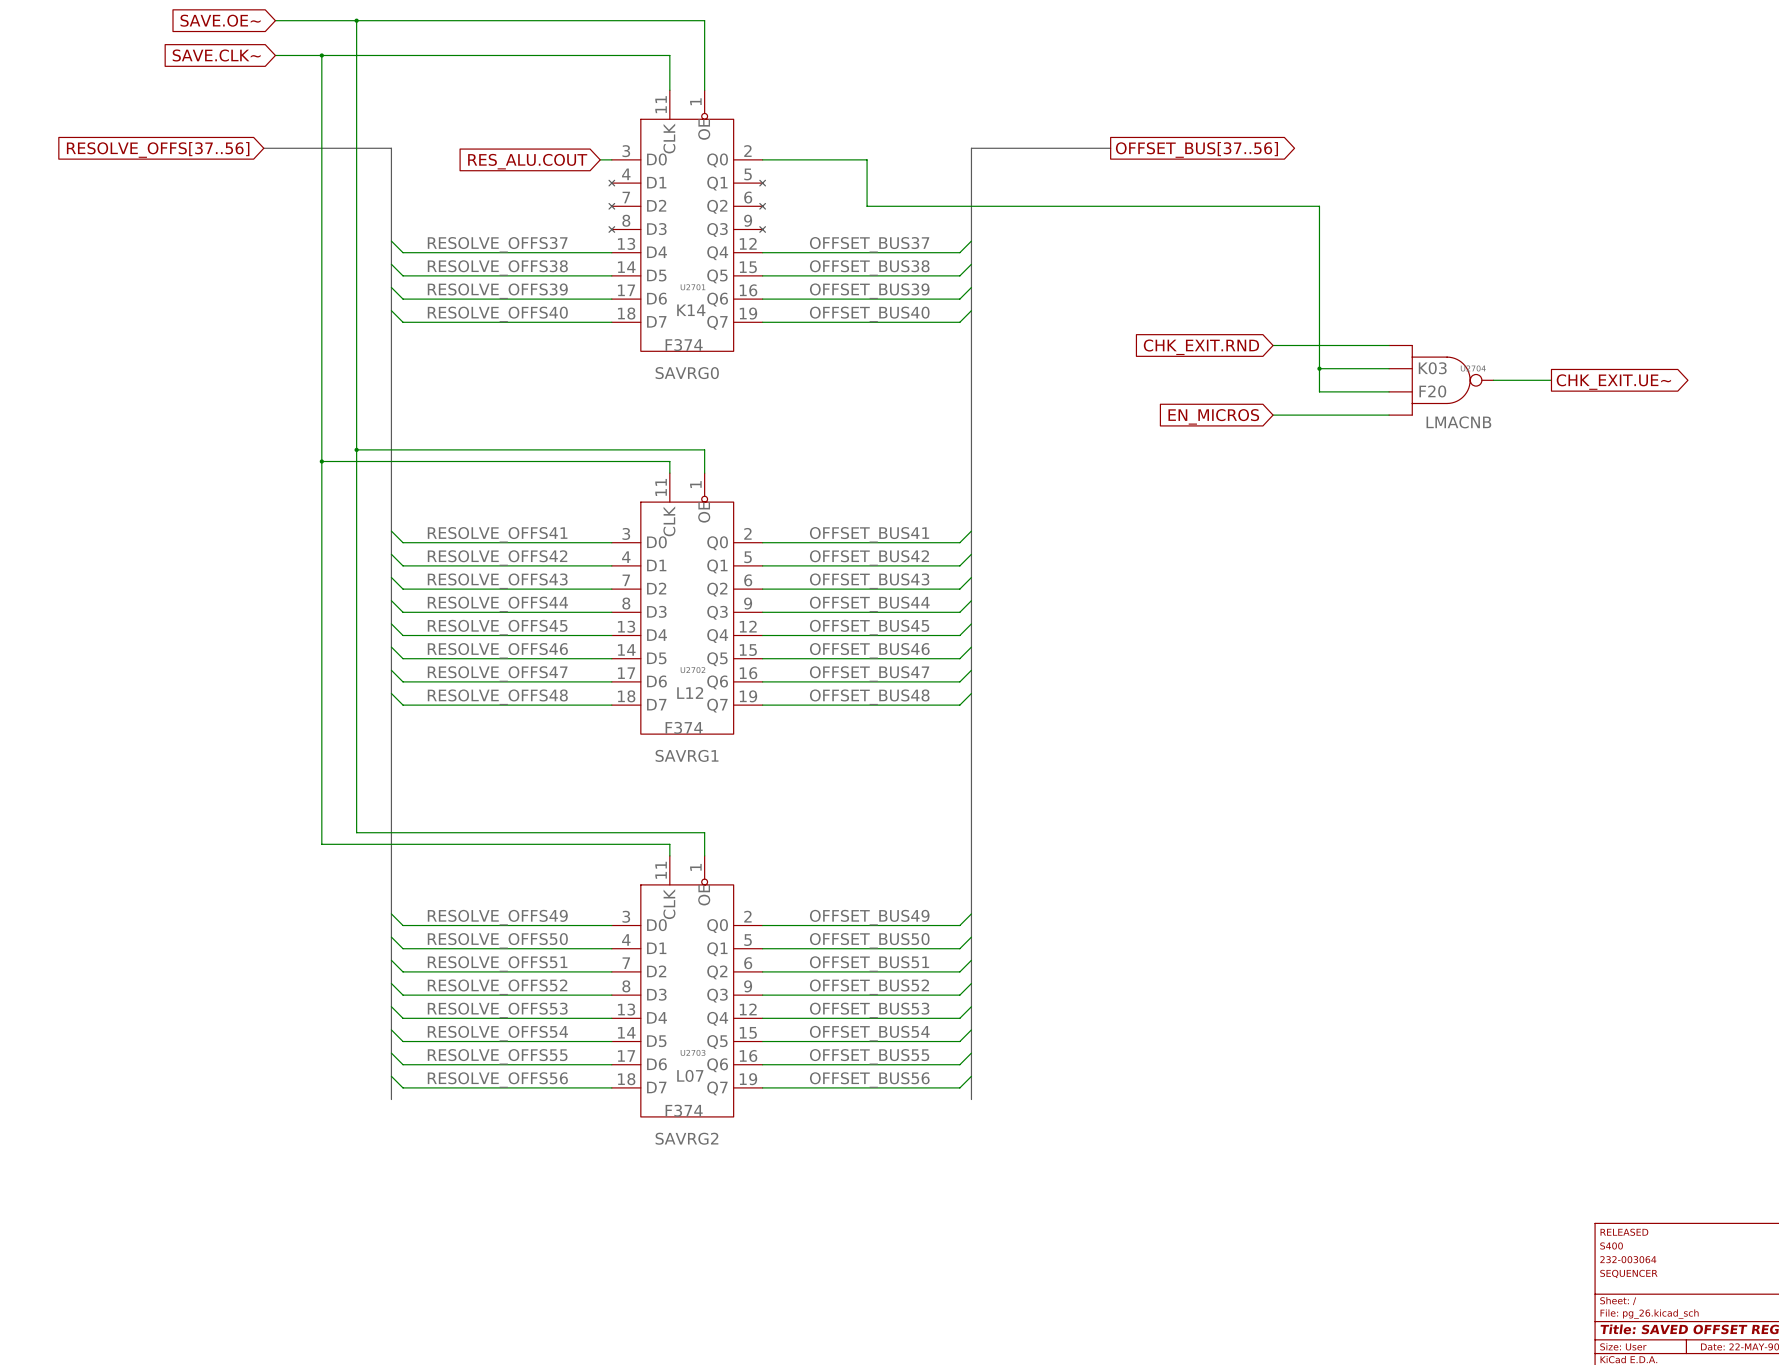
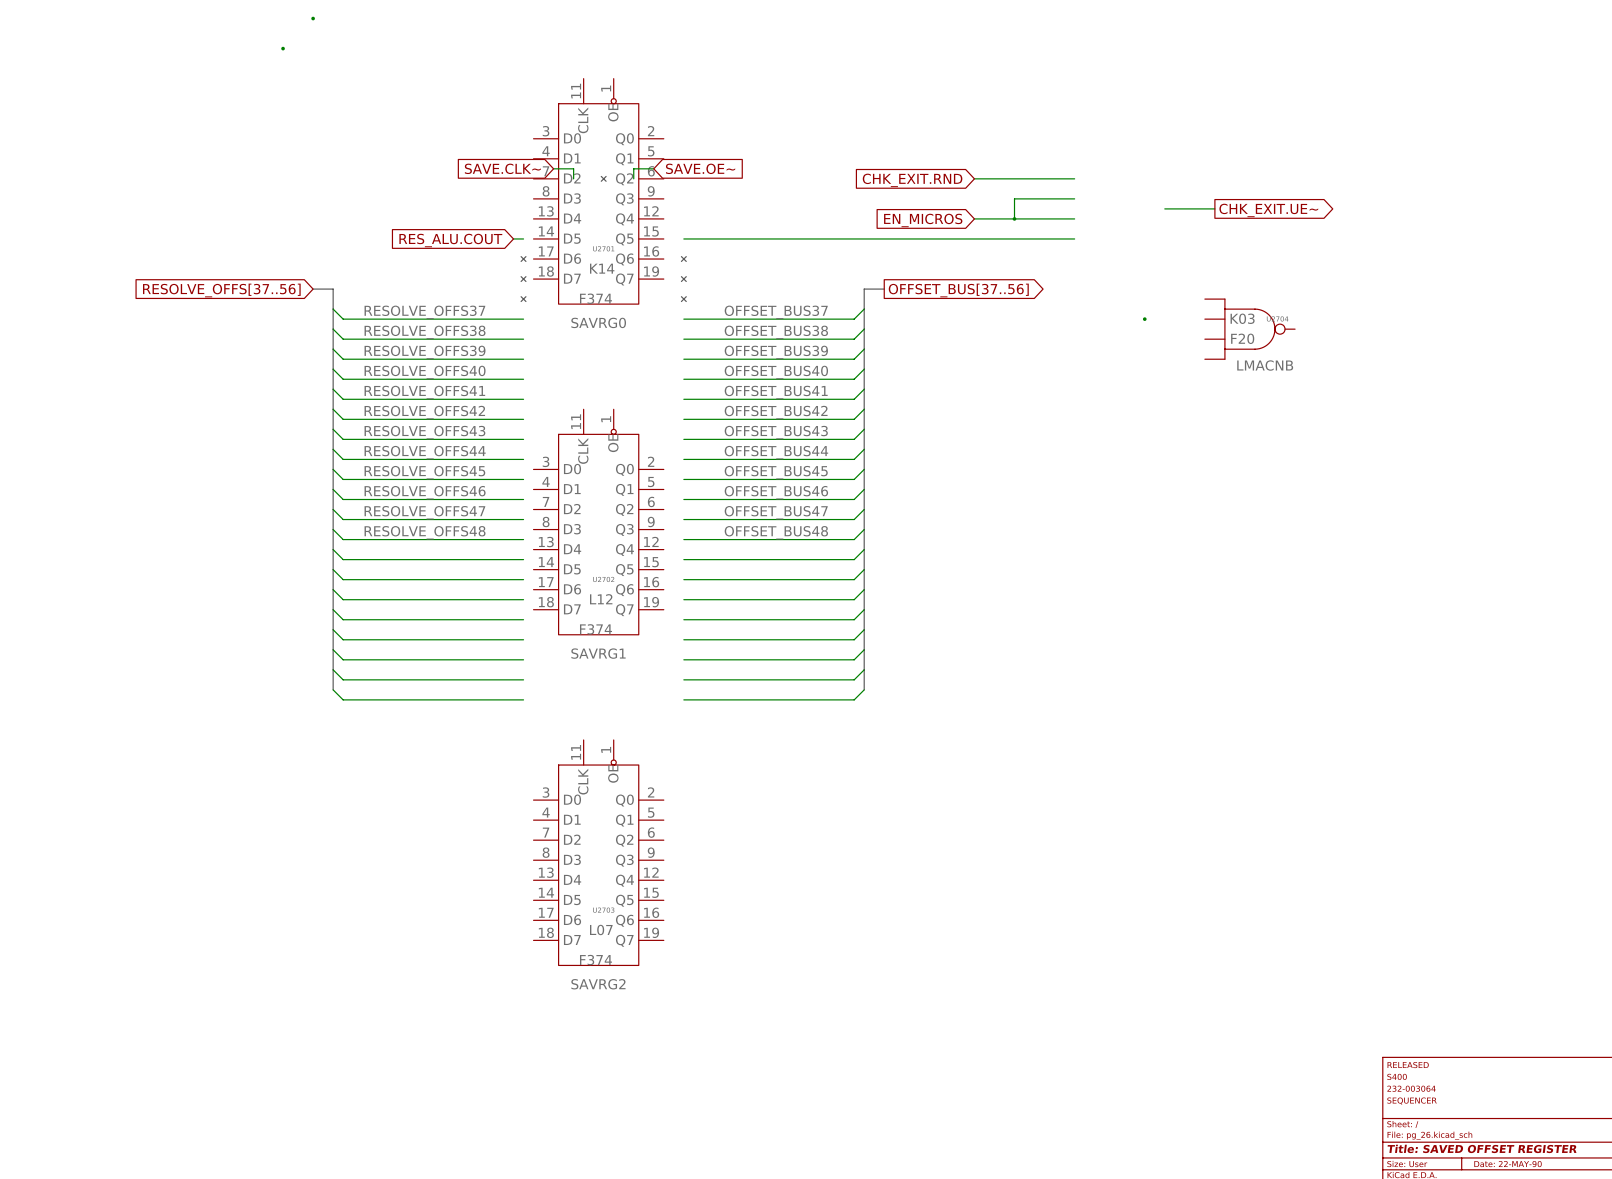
global label: SAVE.OE~ (220, 20) -> none
wire: (275, 20) (704, 20) (704, 90) -> none
wire: (356, 20) (356, 832) (704, 832) (704, 855) -> none
global label: SAVE.CLK~ (216, 55) -> none
wire: (275, 55) (669, 55) (669, 90) -> none
wire: (321, 55) (321, 844) (669, 844) (669, 855) -> none
bus: (263, 148) (391, 148) (391, 1099) -> none
bus: (1110, 148) (971, 148) (971, 1099) -> none
global label: RESOLVE_OFFS[37..56] (158, 149) -> none
global label: OFFSET_BUS[37..56] (1196, 149) -> none
wire: (600, 159) (611, 159) -> none
wire: (762, 159) (867, 159) (867, 206) (1122, 206) -> none
global label: RES_ALU.COUT (527, 161) -> none
no-connect mark: (611, 183) -> none
no-connect mark: (762, 183) -> none
global label: none -> SAVE.CLK~ (502, 168)
wire: none -> (553, 168) (573, 168) (573, 178)
wire: none -> (653, 168) (633, 168) (633, 178)
global label: none -> SAVE.OE~ (700, 168)
no-connect mark: (611, 206) -> none
no-connect mark: none -> (603, 178)
no-connect mark: (762, 206) -> none
wire: (1238, 206) (1319, 206) (1319, 391) (1389, 391) -> none
global label: none -> CHK_EXIT.RND (912, 180)
no-connect mark: (611, 229) -> none
no-connect mark: (762, 229) -> none
wire: none -> (1074, 198) (1014, 198) (1014, 218)
wire: (391, 241) (403, 252) (611, 252) -> none
wire: (971, 241) (959, 252) (762, 252) -> none
wire: none -> (1164, 208) (1214, 208)
global label: none -> CHK_EXIT.UE~ (1268, 210)
label: RESOLVE_OFFS37 (497, 244) -> none
label: OFFSET_BUS37 (869, 244) -> none
wire: none -> (974, 218) (1074, 218)
junction: none -> (1014, 218)
global label: none -> EN_MICROS (923, 220)
wire: (391, 264) (403, 275) (588, 275) -> none
wire: (971, 264) (959, 275) -> (1074, 238) (834, 238)
label: RESOLVE_OFFS38 (497, 268) -> none
label: OFFSET_BUS38 (869, 268) -> none
wire: (600, 275) (611, 275) -> none
wire: (762, 275) (785, 275) -> none
global label: none -> RES_ALU.COUT (450, 240)
wire: (391, 287) (403, 299) (611, 299) -> (333, 309) (343, 319) (523, 319)
wire: (971, 287) (959, 299) (762, 299) -> (864, 309) (854, 319) (683, 319)
label: RESOLVE_OFFS39 (497, 291) -> none
label: OFFSET_BUS39 (869, 291) -> none
no-connect mark: none -> (523, 259)
no-connect mark: none -> (683, 259)
wire: (391, 310) (403, 322) (611, 322) -> (333, 329) (343, 339) (523, 339)
wire: (971, 310) (959, 322) (762, 322) -> (864, 329) (854, 339) (683, 339)
label: RESOLVE_OFFS40 (497, 314) -> none
label: OFFSET_BUS40 (869, 314) -> none
no-connect mark: none -> (523, 279)
no-connect mark: none -> (683, 279)
bus: none -> (313, 289) (333, 289) (333, 689)
bus: none -> (884, 289) (864, 289) (864, 689)
global label: none -> RESOLVE_OFFS[37..56] (221, 290)
global label: none -> OFFSET_BUS[37..56] (958, 290)
no-connect mark: none -> (523, 299)
no-connect mark: none -> (683, 299)
wire: (1273, 345) (1389, 345) -> none
global label: CHK_EXIT.RND (1201, 347) -> none
label: none -> RESOLVE_OFFS37 (424, 312)
label: none -> OFFSET_BUS37 (776, 312)
wire: (1319, 368) (1389, 368) -> none
wire: (1493, 380) (1551, 380) -> none
global label: CHK_EXIT.UE~ (1613, 382) -> none
label: none -> RESOLVE_OFFS38 (425, 332)
label: none -> OFFSET_BUS38 (776, 332)
wire: none -> (333, 349) (343, 359) (523, 359)
wire: none -> (864, 349) (854, 359) (683, 359)
label: none -> RESOLVE_OFFS39 (425, 352)
label: none -> OFFSET_BUS39 (776, 352)
wire: (1273, 415) (1389, 415) -> none
global label: EN_MICROS (1213, 416) -> none
wire: none -> (333, 369) (343, 379) (523, 379)
wire: none -> (864, 369) (854, 379) (683, 379)
label: none -> RESOLVE_OFFS40 (425, 372)
label: none -> OFFSET_BUS40 (776, 372)
wire: (356, 449) (704, 449) (704, 473) -> none
junction: (356, 449) -> none
wire: none -> (864, 389) (854, 399) (683, 399)
wire: (321, 461) (391, 461) -> (333, 389) (343, 399)
junction: (321, 461) -> none
wire: (600, 461) (669, 461) (669, 473) -> none
wire: none -> (333, 409) (343, 419) (523, 419)
wire: none -> (864, 409) (854, 419) (683, 419)
wire: none -> (333, 429) (343, 439) (523, 439)
wire: none -> (864, 429) (854, 439) (683, 439)
wire: (391, 531) (403, 542) (611, 542) -> (333, 449) (343, 459) (523, 459)
wire: (971, 531) (959, 542) (762, 542) -> (864, 449) (854, 459) (683, 459)
label position: RESOLVE_OFFS41 (497, 534) -> RESOLVE_OFFS41 (424, 392)
label position: OFFSET_BUS41 (869, 534) -> OFFSET_BUS41 (776, 392)
wire: (391, 554) (403, 565) (611, 565) -> (333, 489) (343, 499) (523, 499)
wire: (971, 554) (959, 565) (762, 565) -> (864, 489) (854, 499) (683, 499)
label position: RESOLVE_OFFS42 (497, 558) -> RESOLVE_OFFS42 (424, 412)
label position: OFFSET_BUS42 (869, 558) -> OFFSET_BUS42 (776, 412)
wire: (391, 577) (403, 589) (611, 589) -> (333, 469) (343, 479) (523, 479)
wire: (971, 577) (959, 589) (762, 589) -> (864, 469) (854, 479) (683, 479)
label position: RESOLVE_OFFS43 (497, 581) -> RESOLVE_OFFS43 (424, 432)
label position: OFFSET_BUS43 (869, 581) -> OFFSET_BUS43 (776, 432)
wire: (391, 600) (403, 612) (611, 612) -> (333, 509) (343, 519) (523, 519)
wire: (971, 600) (959, 612) (762, 612) -> (864, 509) (854, 519) (683, 519)
label position: RESOLVE_OFFS44 (497, 604) -> RESOLVE_OFFS44 (425, 452)
label position: OFFSET_BUS44 (869, 604) -> OFFSET_BUS44 (776, 452)
wire: (391, 623) (403, 635) (611, 635) -> (333, 529) (343, 539) (523, 539)
wire: (971, 623) (959, 635) (762, 635) -> (864, 529) (854, 539) (683, 539)
label position: RESOLVE_OFFS45 (497, 627) -> RESOLVE_OFFS45 (424, 472)
label position: OFFSET_BUS45 (869, 627) -> OFFSET_BUS45 (776, 472)
wire: (391, 647) (403, 658) (611, 658) -> (333, 549) (343, 559) (523, 559)
wire: (971, 647) (959, 658) (762, 658) -> (864, 549) (854, 559) (683, 559)
label position: RESOLVE_OFFS46 (497, 650) -> RESOLVE_OFFS46 (425, 492)
label position: OFFSET_BUS46 (869, 650) -> OFFSET_BUS46 (776, 492)
wire: none -> (333, 569) (343, 579) (523, 579)
wire: none -> (864, 569) (854, 579) (683, 579)
wire: (391, 670) (403, 681) (611, 681) -> (333, 589) (343, 599) (523, 599)
wire: (971, 670) (959, 681) (762, 681) -> (864, 589) (854, 599) (683, 599)
label position: RESOLVE_OFFS47 (497, 674) -> RESOLVE_OFFS47 (424, 512)
label position: OFFSET_BUS47 (869, 674) -> OFFSET_BUS47 (776, 512)
wire: (391, 693) (403, 705) (611, 705) -> (333, 609) (343, 619) (523, 619)
wire: (971, 693) (959, 705) (762, 705) -> (864, 609) (854, 619) (683, 619)
label position: RESOLVE_OFFS48 (497, 697) -> RESOLVE_OFFS48 (425, 532)
label position: OFFSET_BUS48 (869, 697) -> OFFSET_BUS48 (776, 532)
wire: none -> (333, 629) (343, 639) (523, 639)
wire: none -> (864, 629) (854, 639) (683, 639)
wire: none -> (333, 649) (343, 659) (523, 659)
wire: none -> (864, 649) (854, 659) (683, 659)
wire: none -> (333, 669) (343, 679) (523, 679)
wire: none -> (864, 669) (854, 679) (683, 679)
wire: none -> (333, 689) (343, 699) (523, 699)
wire: none -> (864, 689) (854, 699) (683, 699)
wire: (391, 913) (403, 925) (611, 925) -> none
wire: (971, 913) (959, 925) (762, 925) -> none
label: RESOLVE_OFFS49 (497, 917) -> none
label: OFFSET_BUS49 (869, 917) -> none
wire: (391, 937) (403, 948) (611, 948) -> none
wire: (971, 937) (959, 948) (762, 948) -> none
label: RESOLVE_OFFS50 (497, 940) -> none
label: OFFSET_BUS50 (869, 940) -> none
wire: (391, 960) (403, 971) (611, 971) -> none
wire: (971, 960) (959, 971) (762, 971) -> none
label: RESOLVE_OFFS51 (497, 964) -> none
label: OFFSET_BUS51 (869, 964) -> none
wire: (391, 983) (403, 995) (611, 995) -> none
wire: (971, 983) (959, 995) (762, 995) -> none
label: RESOLVE_OFFS52 (497, 987) -> none
label: OFFSET_BUS52 (869, 987) -> none
wire: (391, 1006) (403, 1018) (611, 1018) -> none
wire: (971, 1006) (959, 1018) (762, 1018) -> none
label: RESOLVE_OFFS53 (497, 1010) -> none
label: OFFSET_BUS53 (869, 1010) -> none
wire: (391, 1029) (403, 1041) (611, 1041) -> none
wire: (971, 1029) (959, 1041) (762, 1041) -> none
label: RESOLVE_OFFS54 (497, 1033) -> none
label: OFFSET_BUS54 (869, 1033) -> none
wire: (391, 1053) (403, 1064) (611, 1064) -> none
wire: (971, 1053) (959, 1064) (762, 1064) -> none
label: RESOLVE_OFFS55 (497, 1056) -> none
label: OFFSET_BUS55 (869, 1056) -> none
wire: (391, 1076) (403, 1087) (611, 1087) -> none
wire: (971, 1076) (959, 1087) (762, 1087) -> none
label: RESOLVE_OFFS56 (497, 1080) -> none
label: OFFSET_BUS56 (869, 1080) -> none

